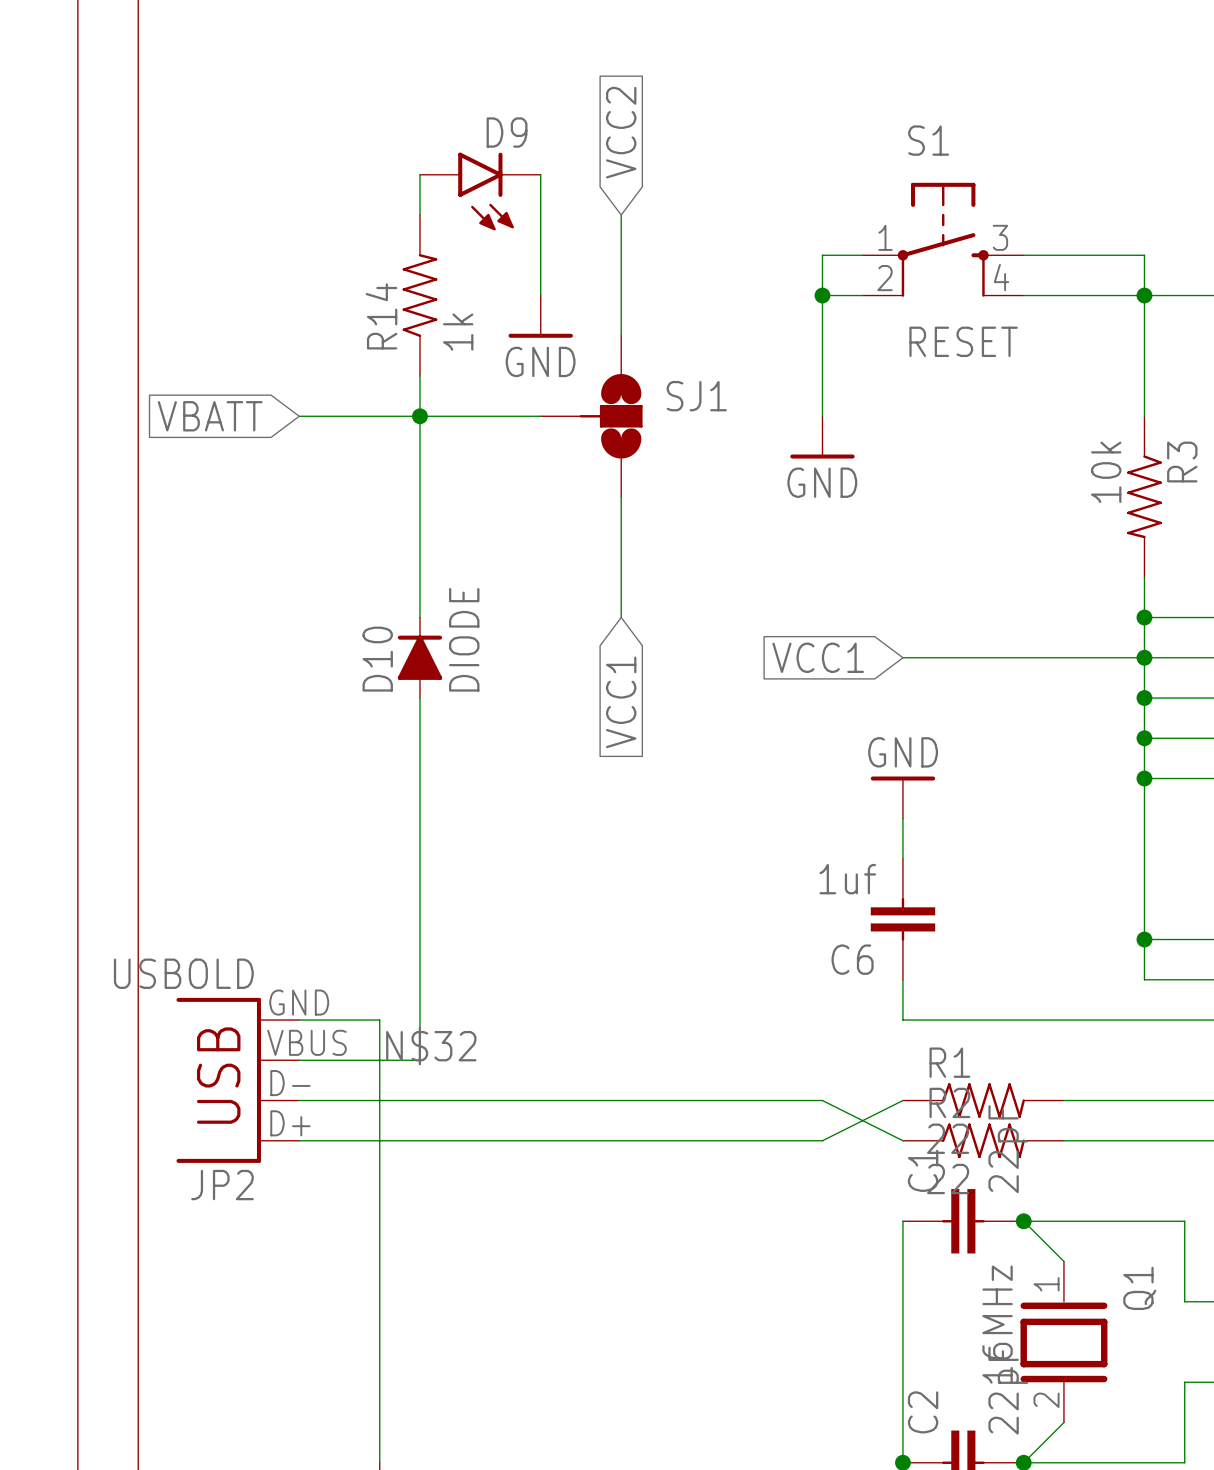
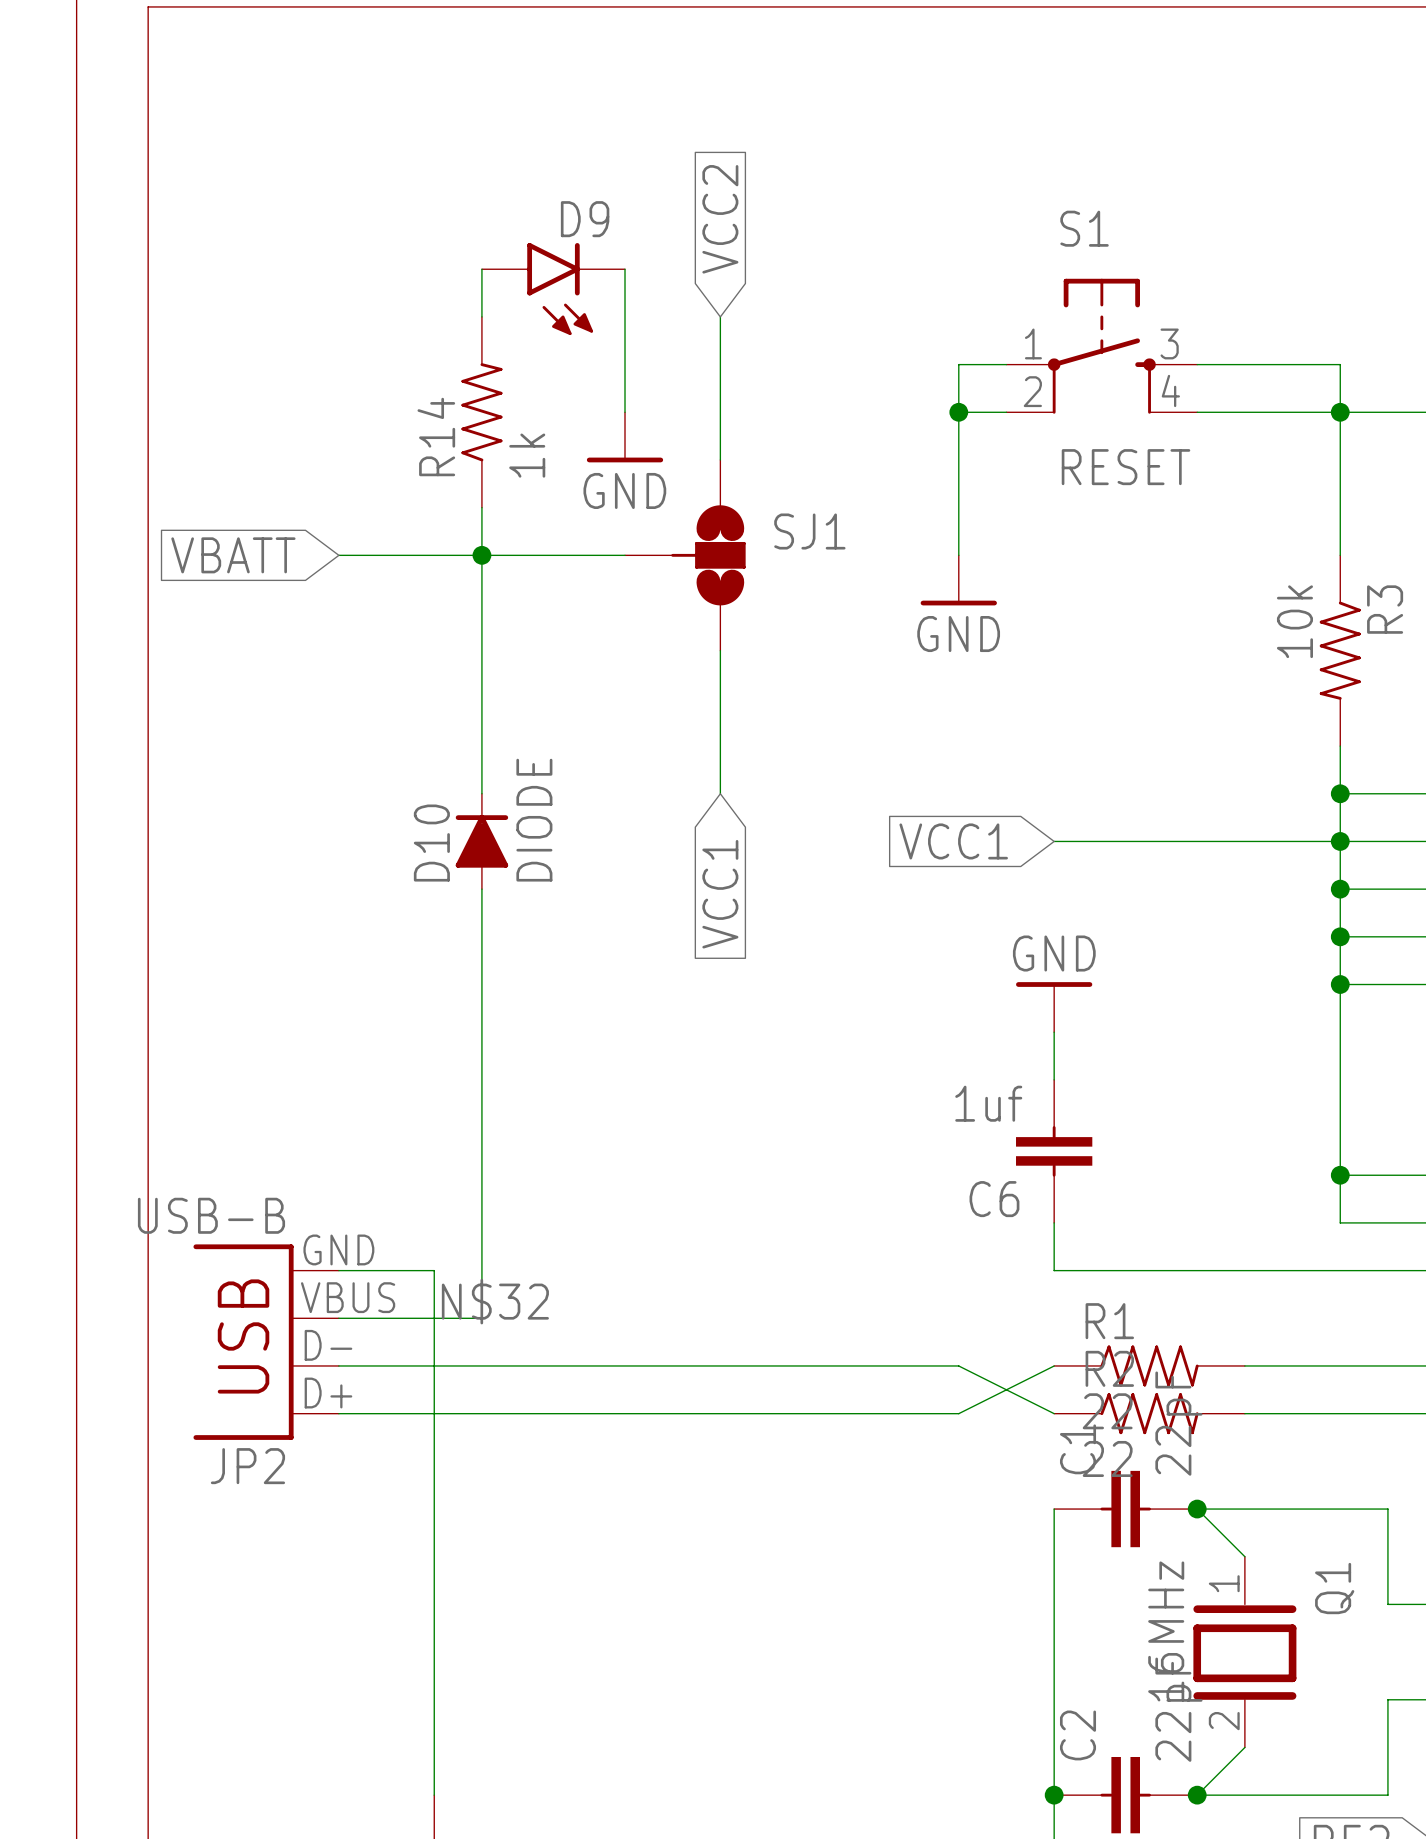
JP2 value: USBOLD (183, 973) -> USB-B (211, 1215)

